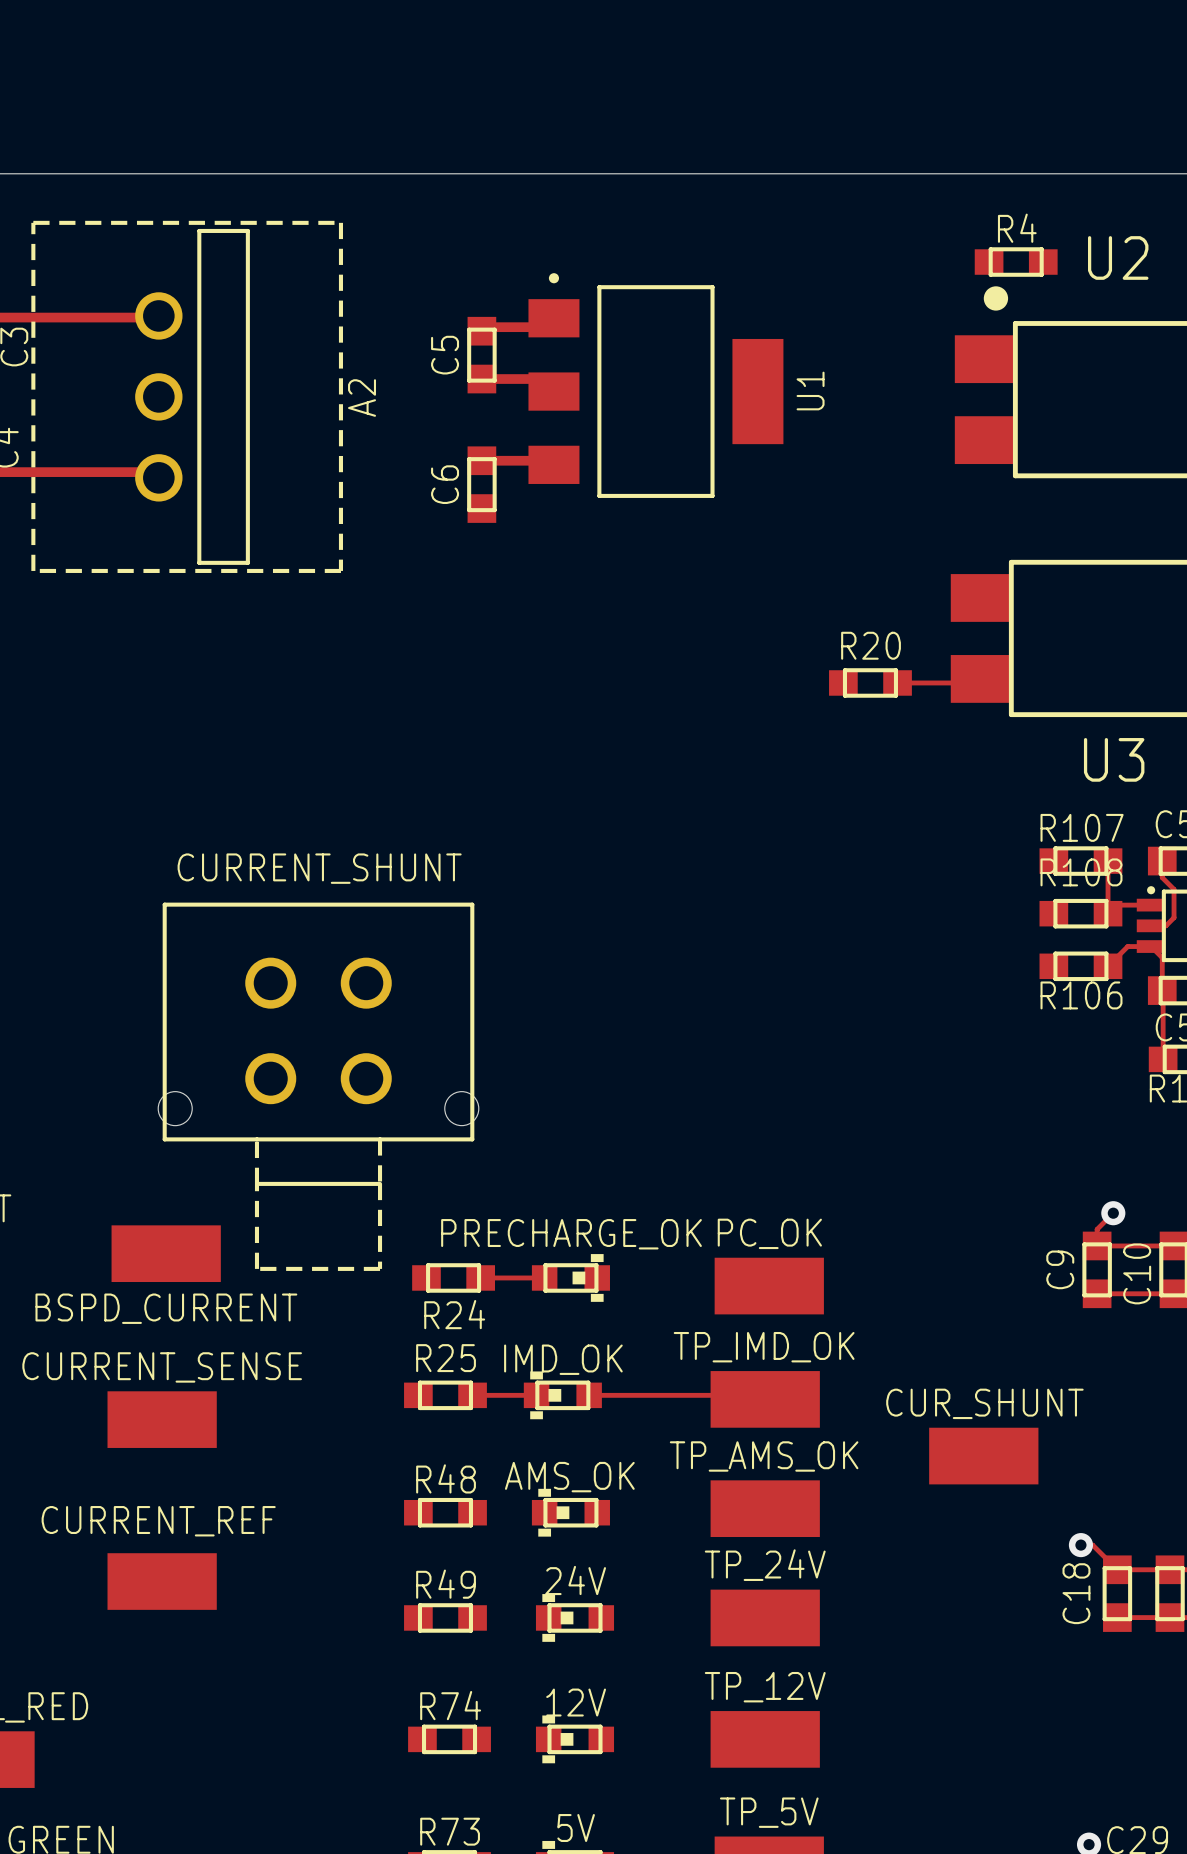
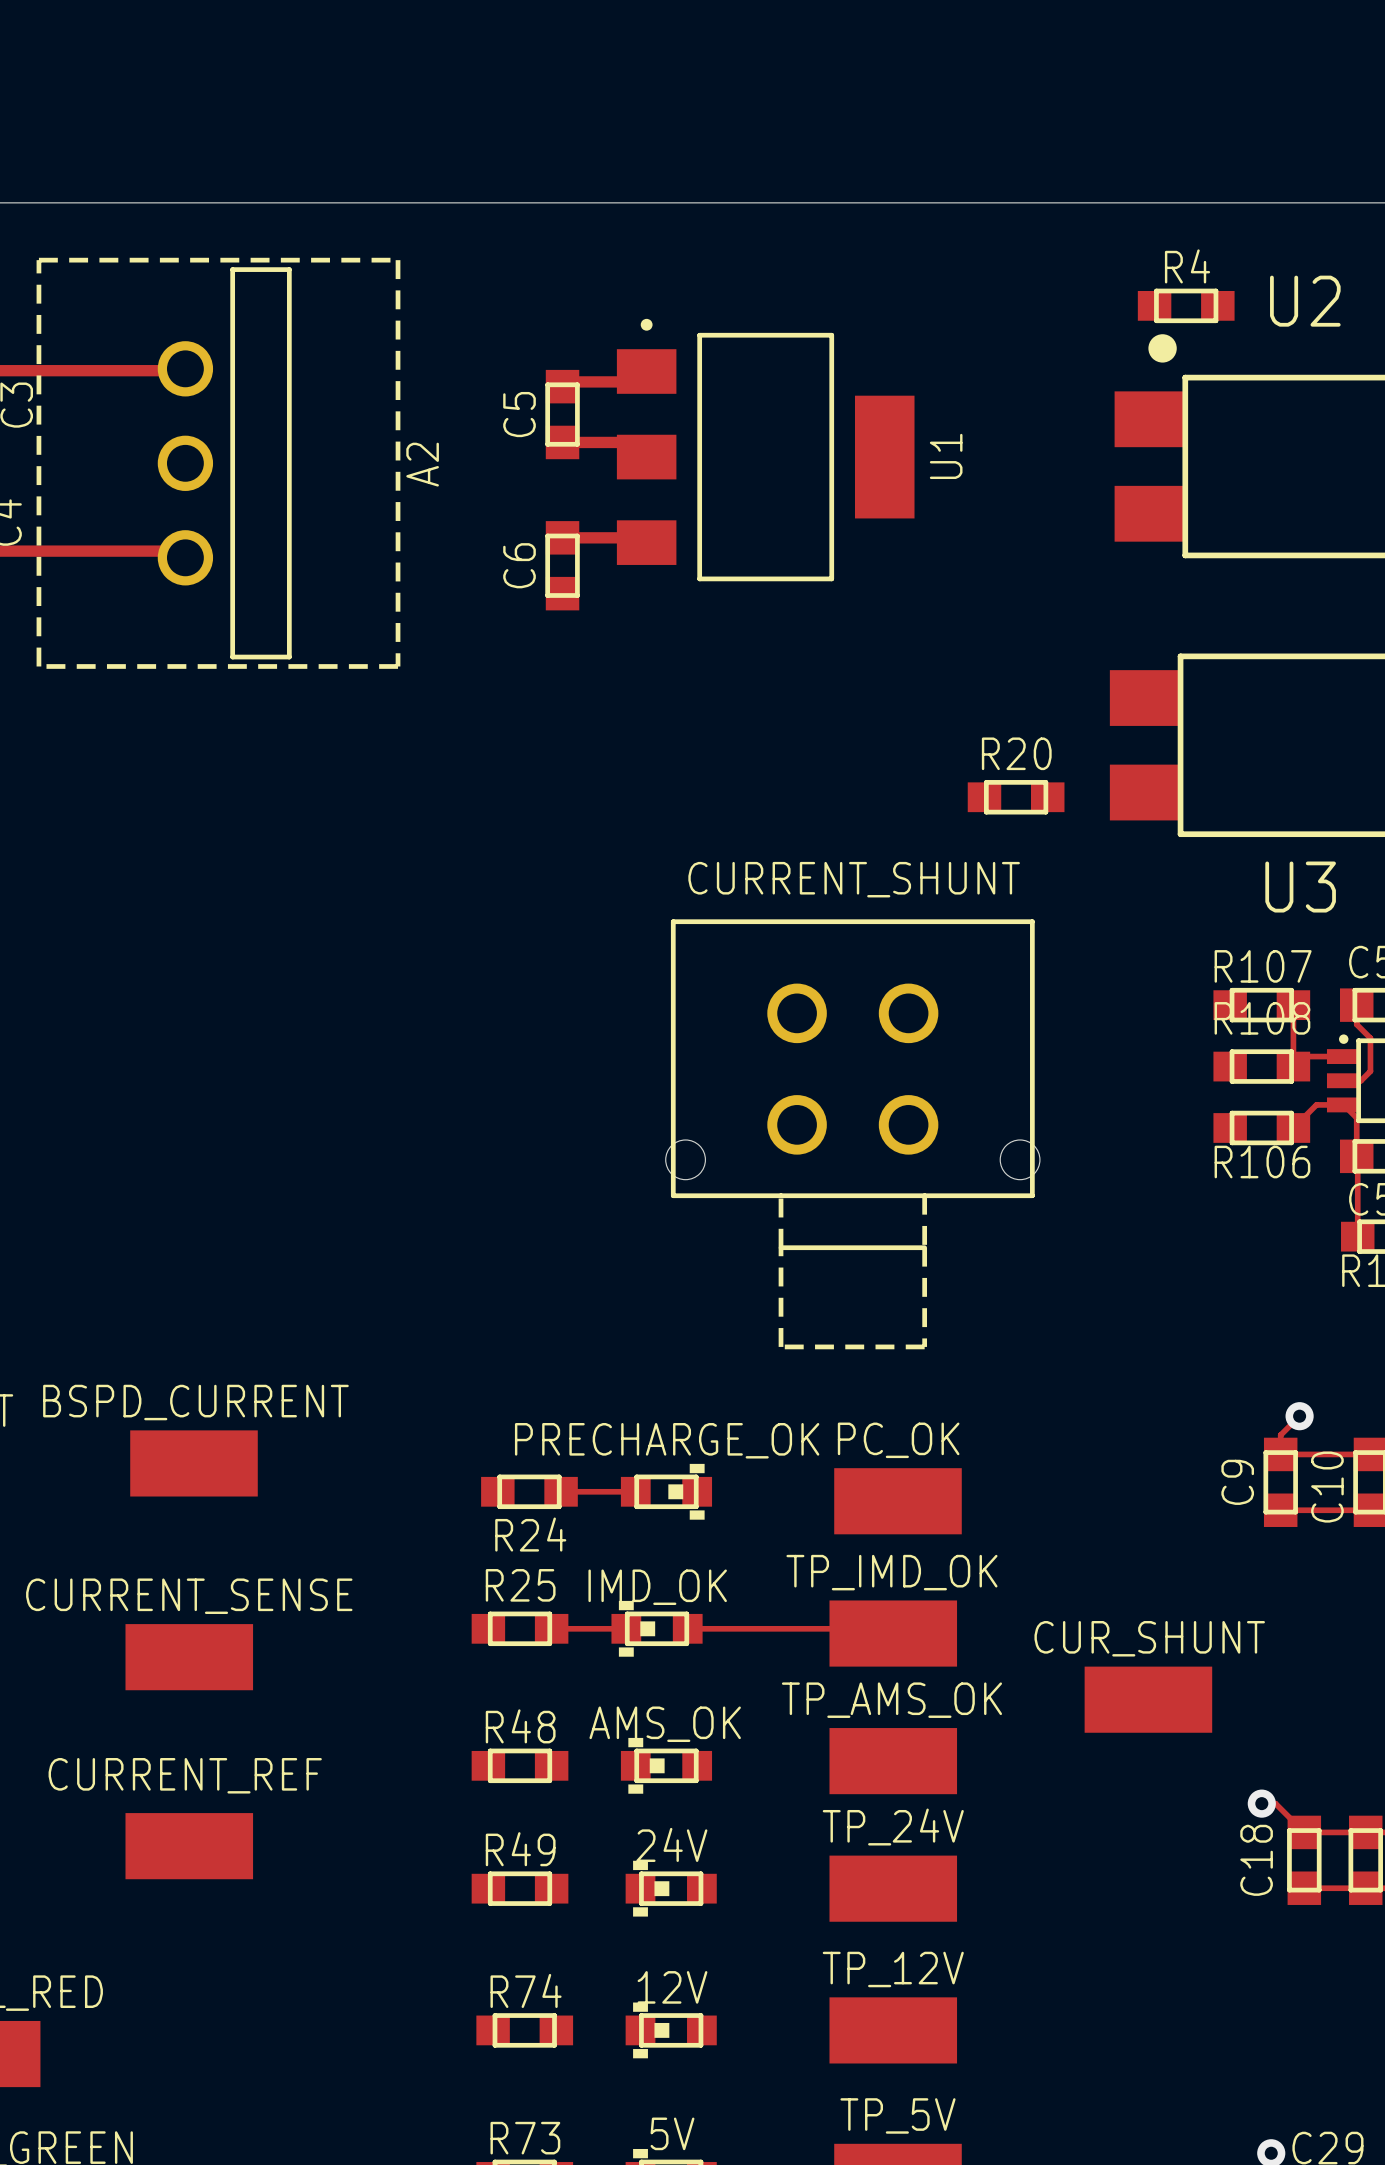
top track: (981, 678) (977, 682) (897, 682) -> none
CURRENT_SHUNT position: (318, 1086) -> (852, 1134)
BSPD_CURRENT name position: BSPD_CURRENT (166, 1308) -> BSPD_CURRENT (195, 1402)

